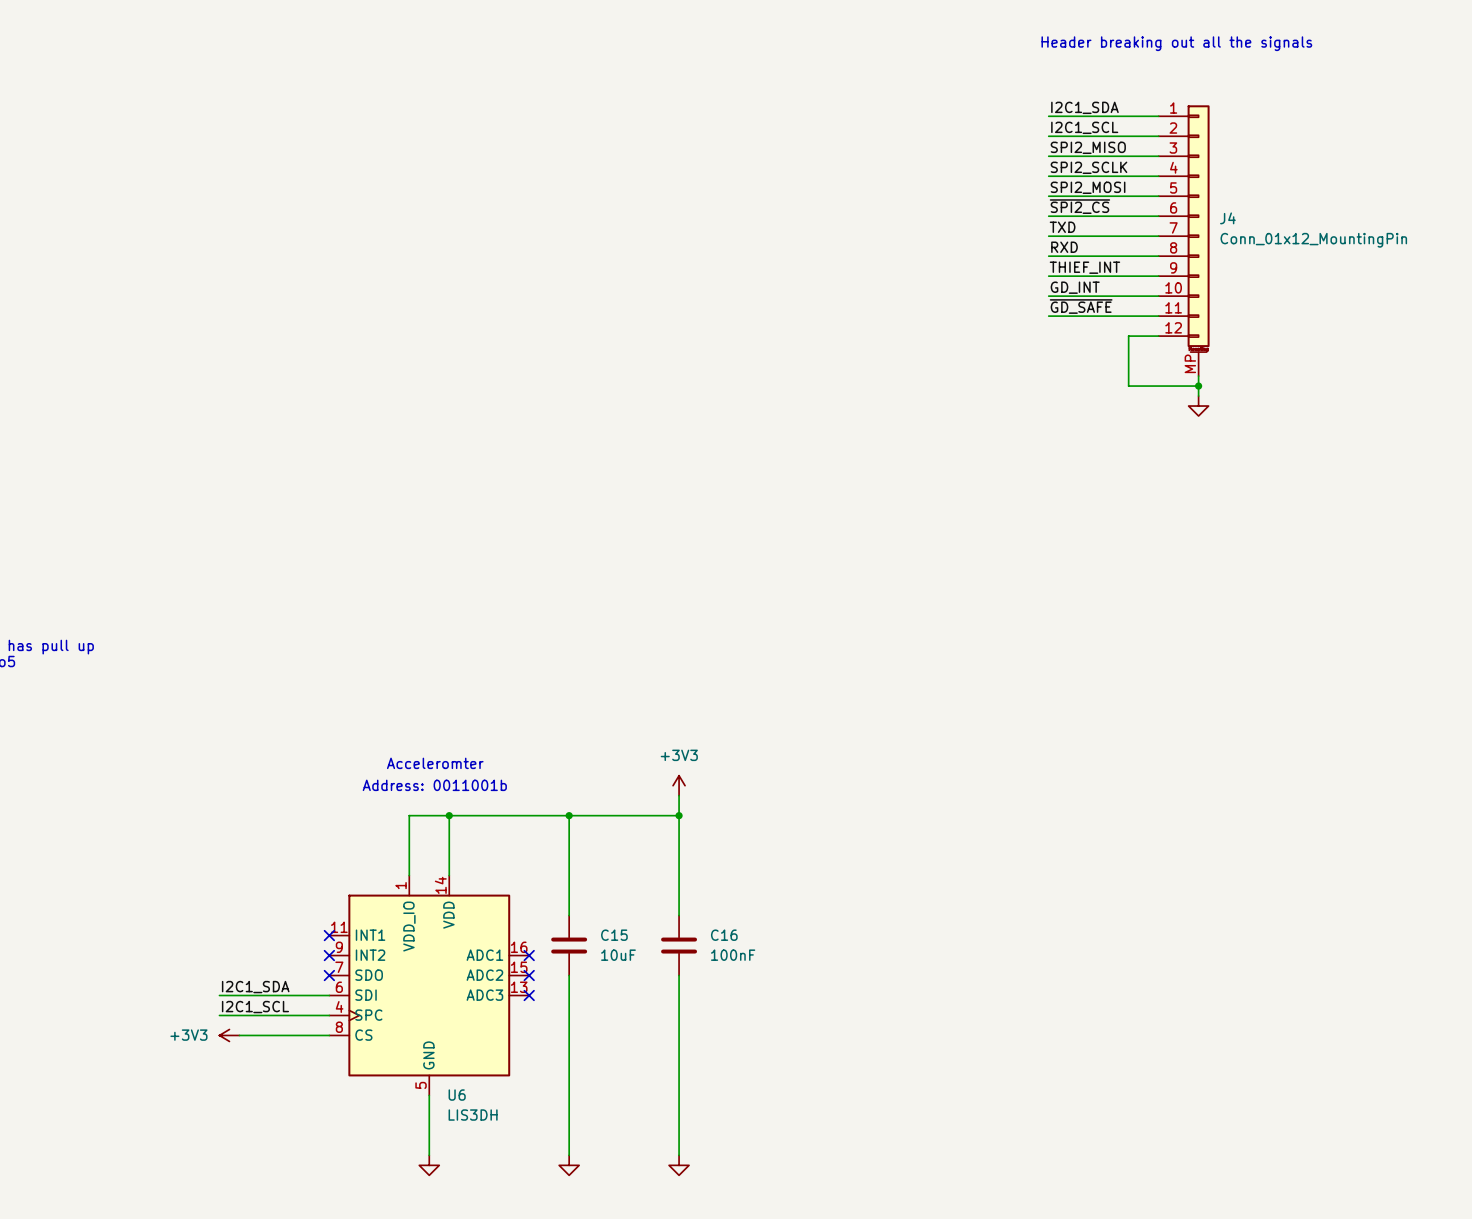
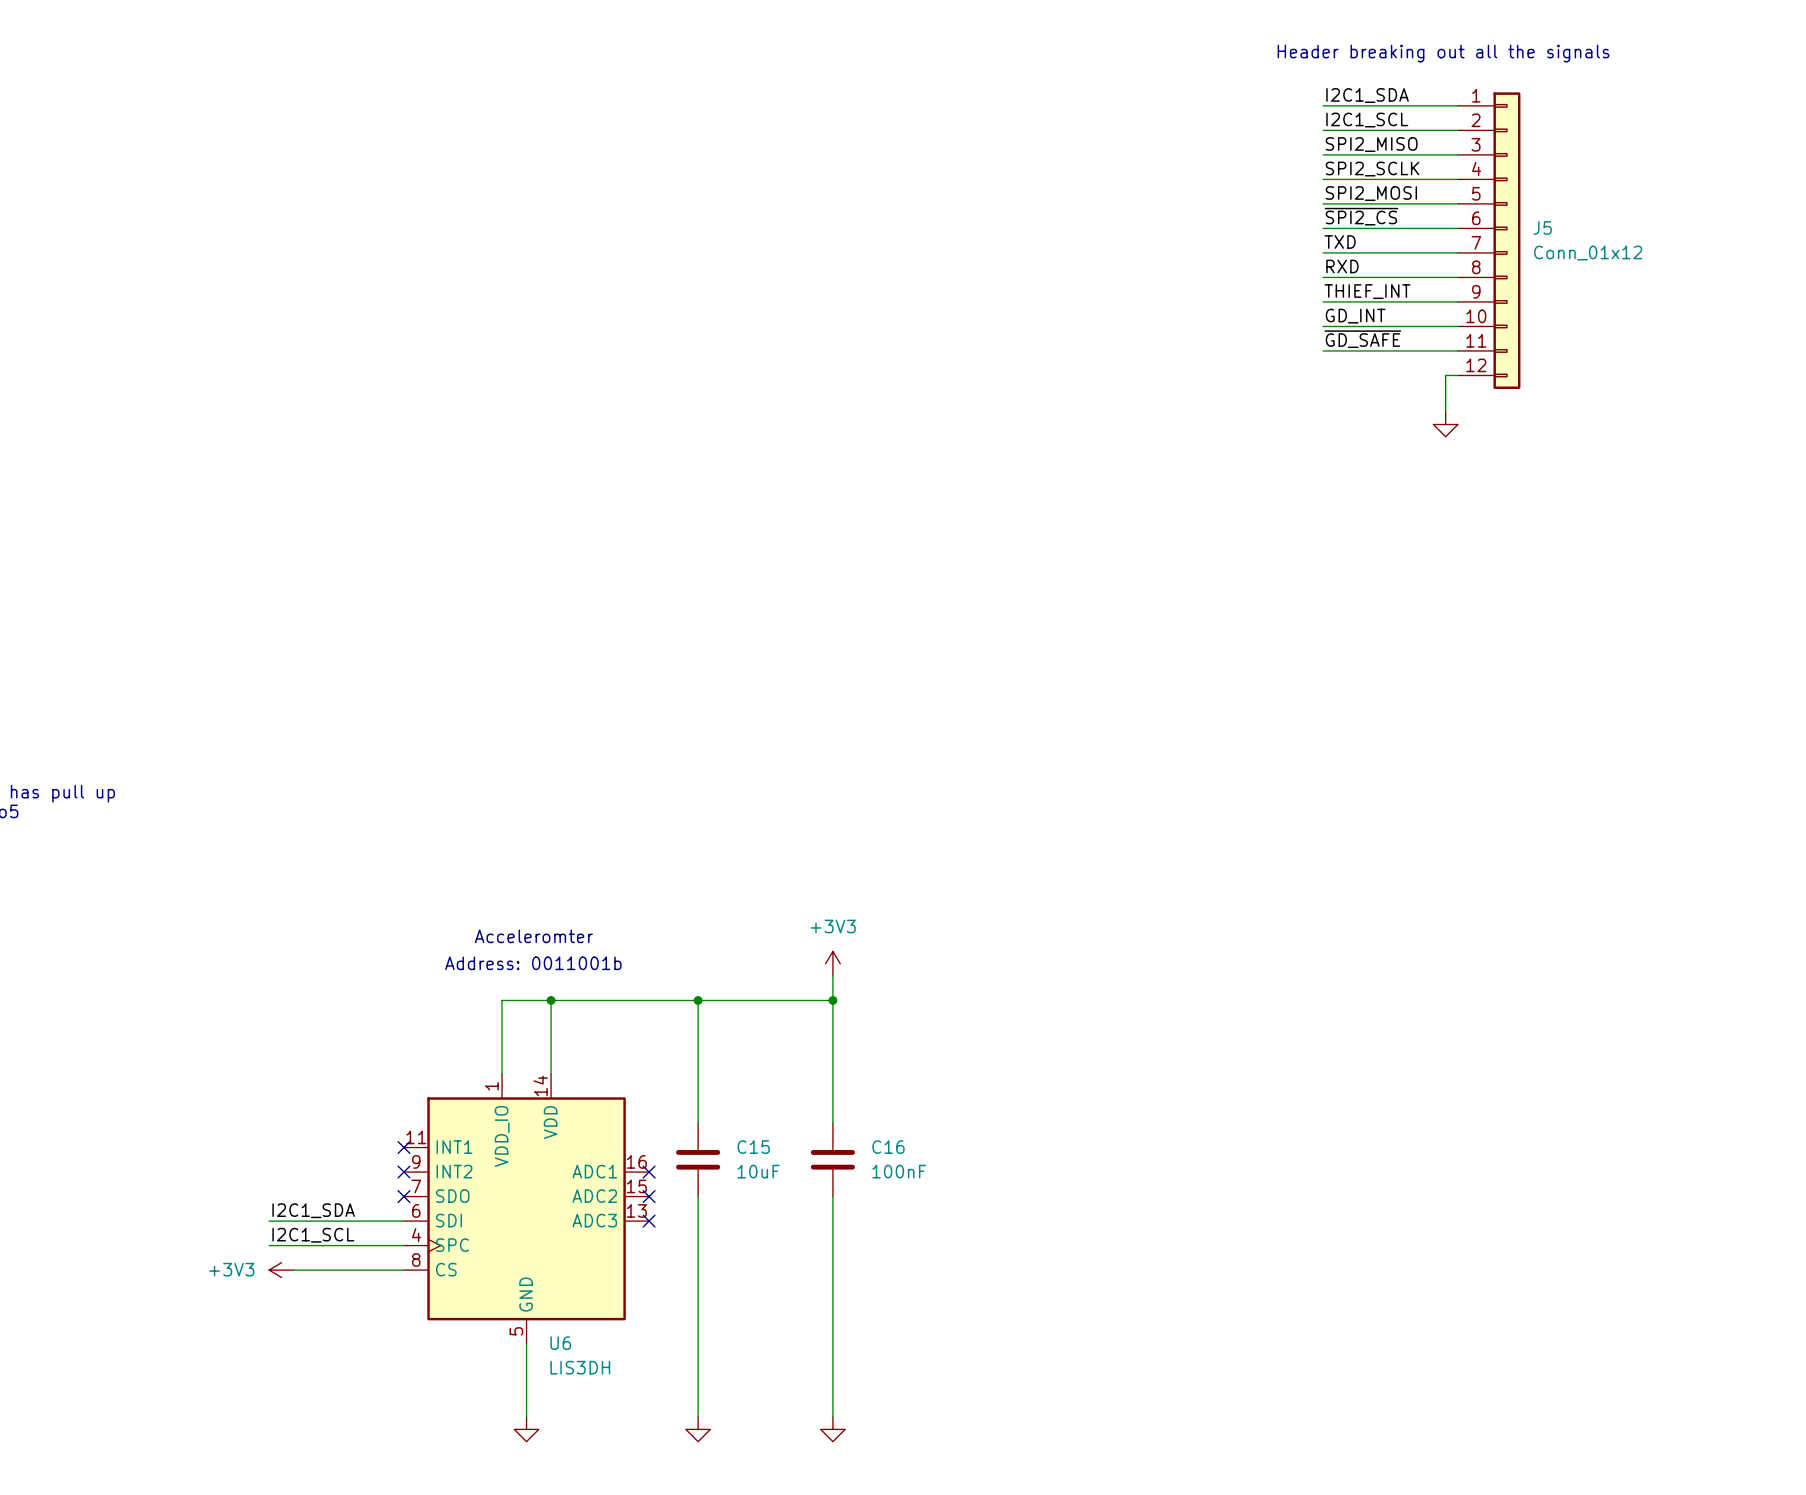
label position: I2C1_SDA (1084, 107) -> I2C1_SDA (1367, 95)
wire: (1048, 116) (1158, 116) -> (1323, 105) (1457, 105)
label position: I2C1_SCL (1084, 127) -> I2C1_SCL (1367, 120)
wire: (1048, 136) (1158, 136) -> (1323, 130) (1457, 130)
label position: SPI2_MISO (1088, 147) -> SPI2_MISO (1371, 144)
wire: (1048, 156) (1158, 156) -> (1323, 154) (1457, 154)
label position: SPI2_SCLK (1089, 167) -> SPI2_SCLK (1372, 169)
wire: (1048, 176) (1158, 176) -> (1323, 179) (1457, 179)
label position: SPI2_MOSI (1088, 187) -> SPI2_MOSI (1371, 193)
wire: (1048, 196) (1158, 196) -> (1323, 203) (1457, 203)
J5: none -> Conn_01x12 (1489, 240)
label position: ~{SPI2_CS} (1079, 206) -> ~{SPI2_CS} (1361, 216)
wire: (1048, 216) (1158, 216) -> (1323, 228) (1457, 228)
label position: TXD (1062, 227) -> TXD (1340, 241)
wire: (1048, 236) (1158, 236) -> (1323, 252) (1457, 252)
J4: Conn_01x12_MountingPin (1184, 240) -> none
label position: RXD (1064, 247) -> RXD (1342, 266)
wire: (1048, 256) (1158, 256) -> (1323, 277) (1457, 277)
label position: THIEF_INT (1084, 267) -> THIEF_INT (1367, 291)
wire: (1048, 276) (1158, 276) -> (1323, 301) (1457, 301)
label position: GD_INT (1075, 287) -> GD_INT (1355, 316)
wire: (1048, 296) (1158, 296) -> (1323, 326) (1457, 326)
label position: ~{GD_SAFE} (1081, 306) -> ~{GD_SAFE} (1362, 339)
wire: none -> (1457, 375) (1445, 375) (1445, 412)
wire: (1048, 316) (1158, 316) -> (1323, 350) (1457, 350)
wire: (1158, 336) (1128, 336) (1128, 386) (1198, 386) -> none
wire: (1198, 376) (1198, 396) -> none
junction: (1198, 386) -> none
power symbol position: (1198, 406) -> (1445, 424)

